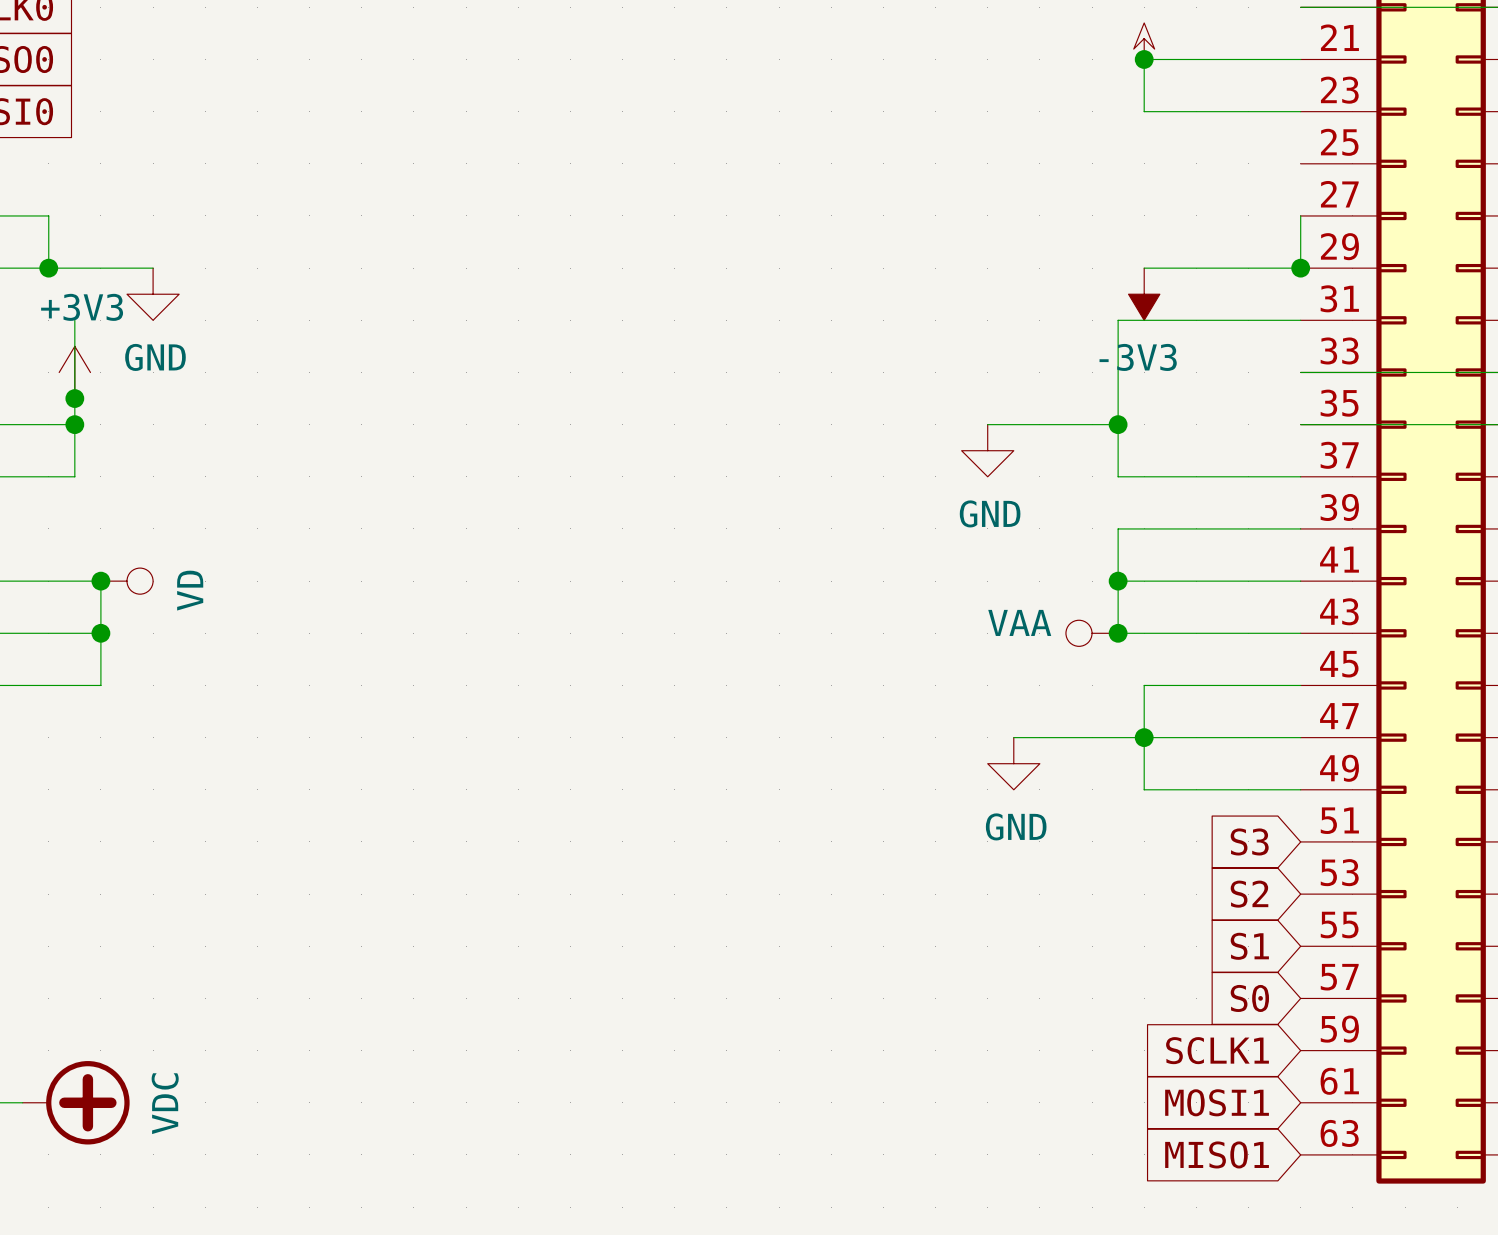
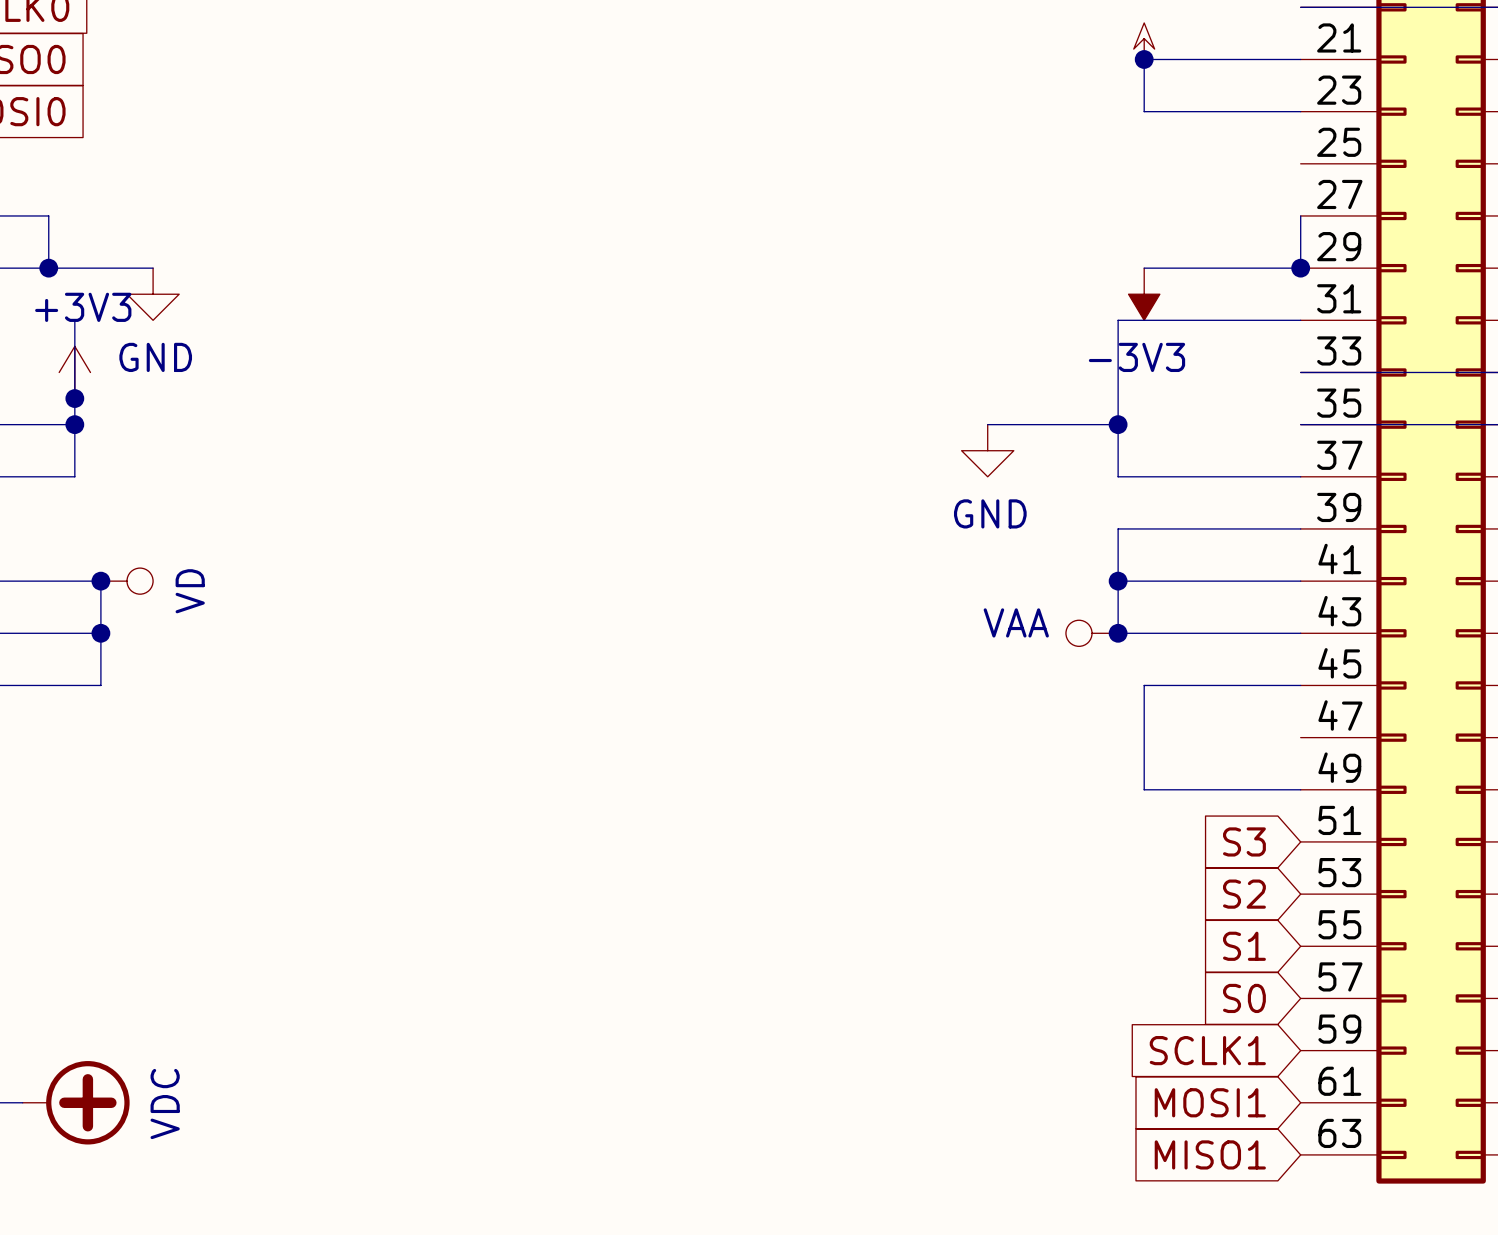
wire: (1013, 737) (1300, 737) -> none
junction: (1144, 737) -> none
power symbol: GND (1013, 763) -> none

